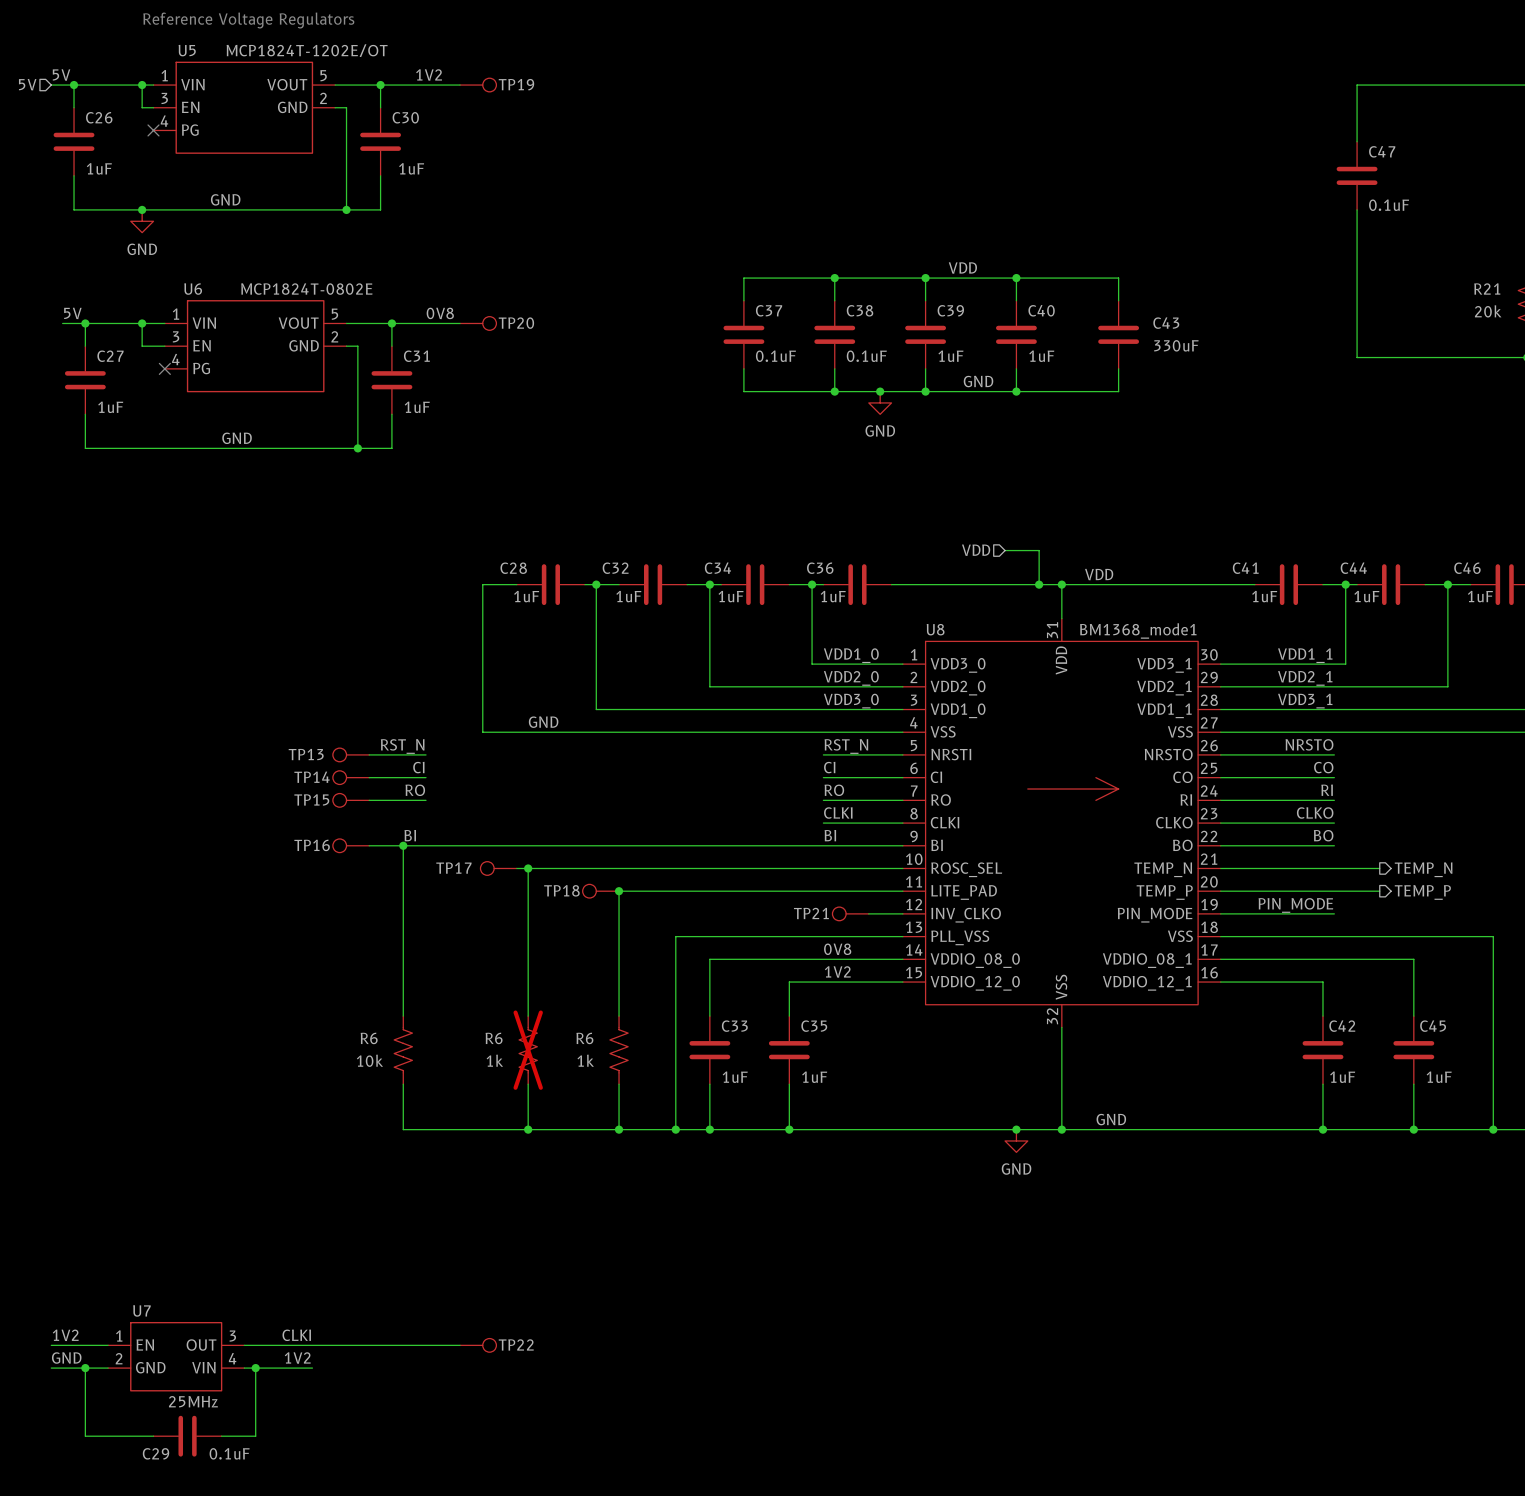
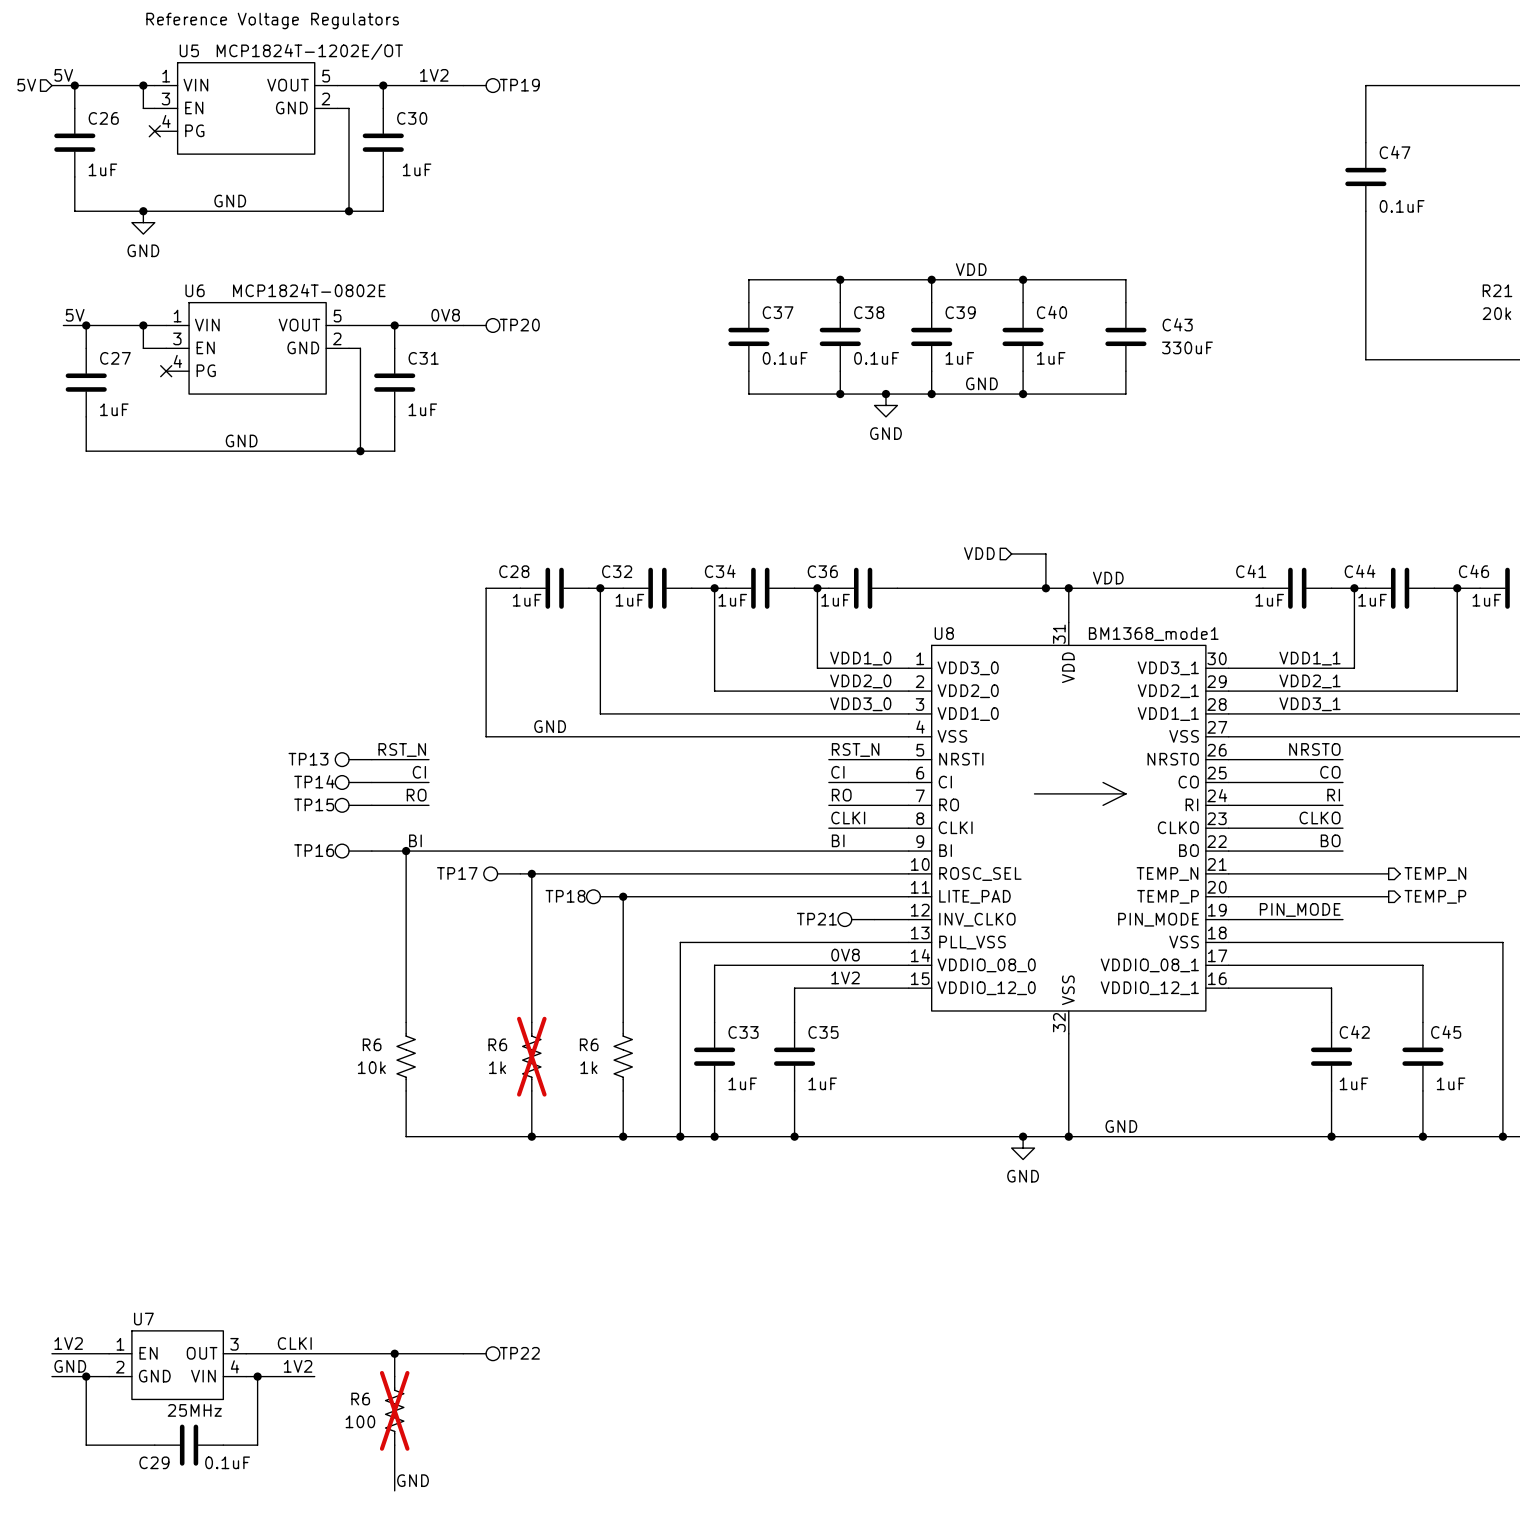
wire: none -> (394, 1353) (394, 1376)
junction: none -> (394, 1353)
R6: none -> 100 (394, 1410)
wire: none -> (394, 1445) (394, 1490)
label: none -> GND (413, 1480)

